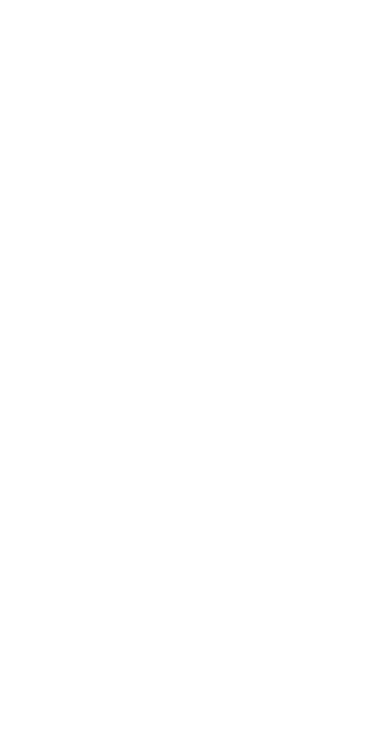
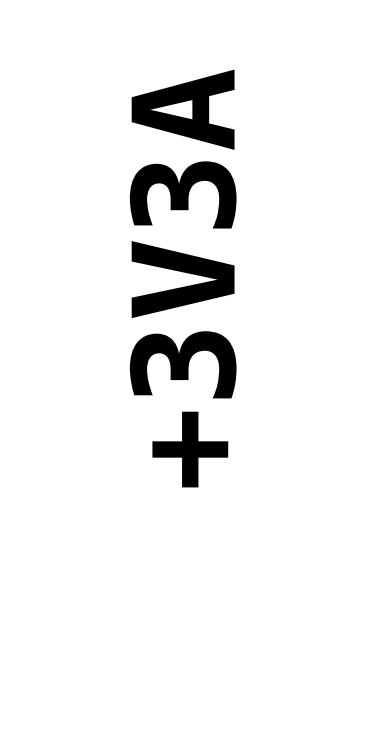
text: none -> +3V3A (183, 278)

